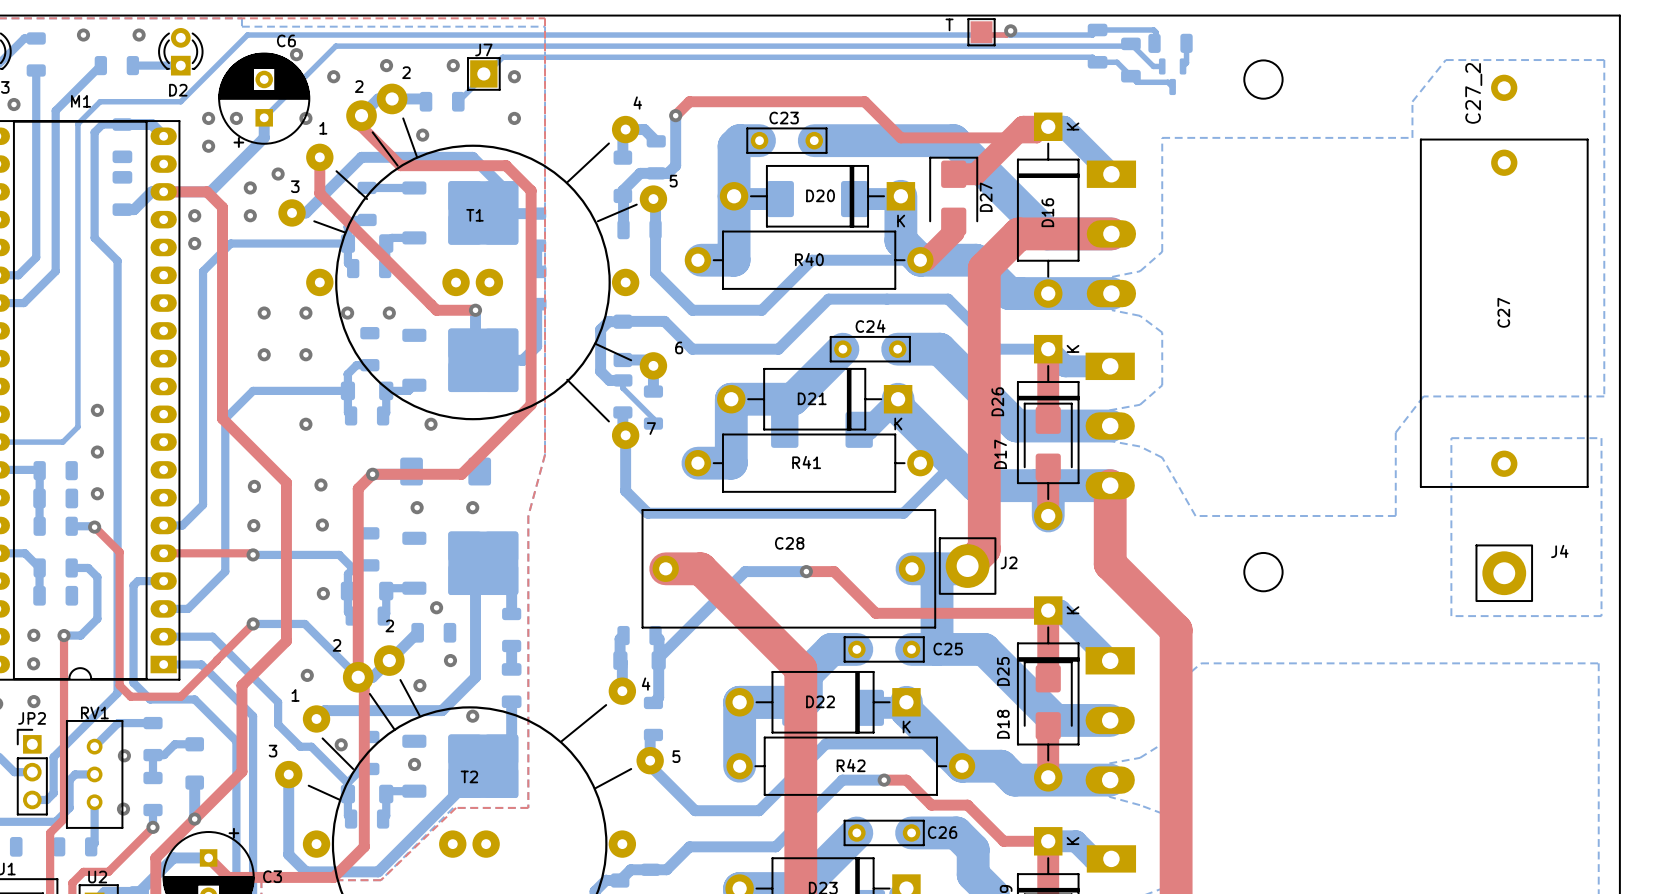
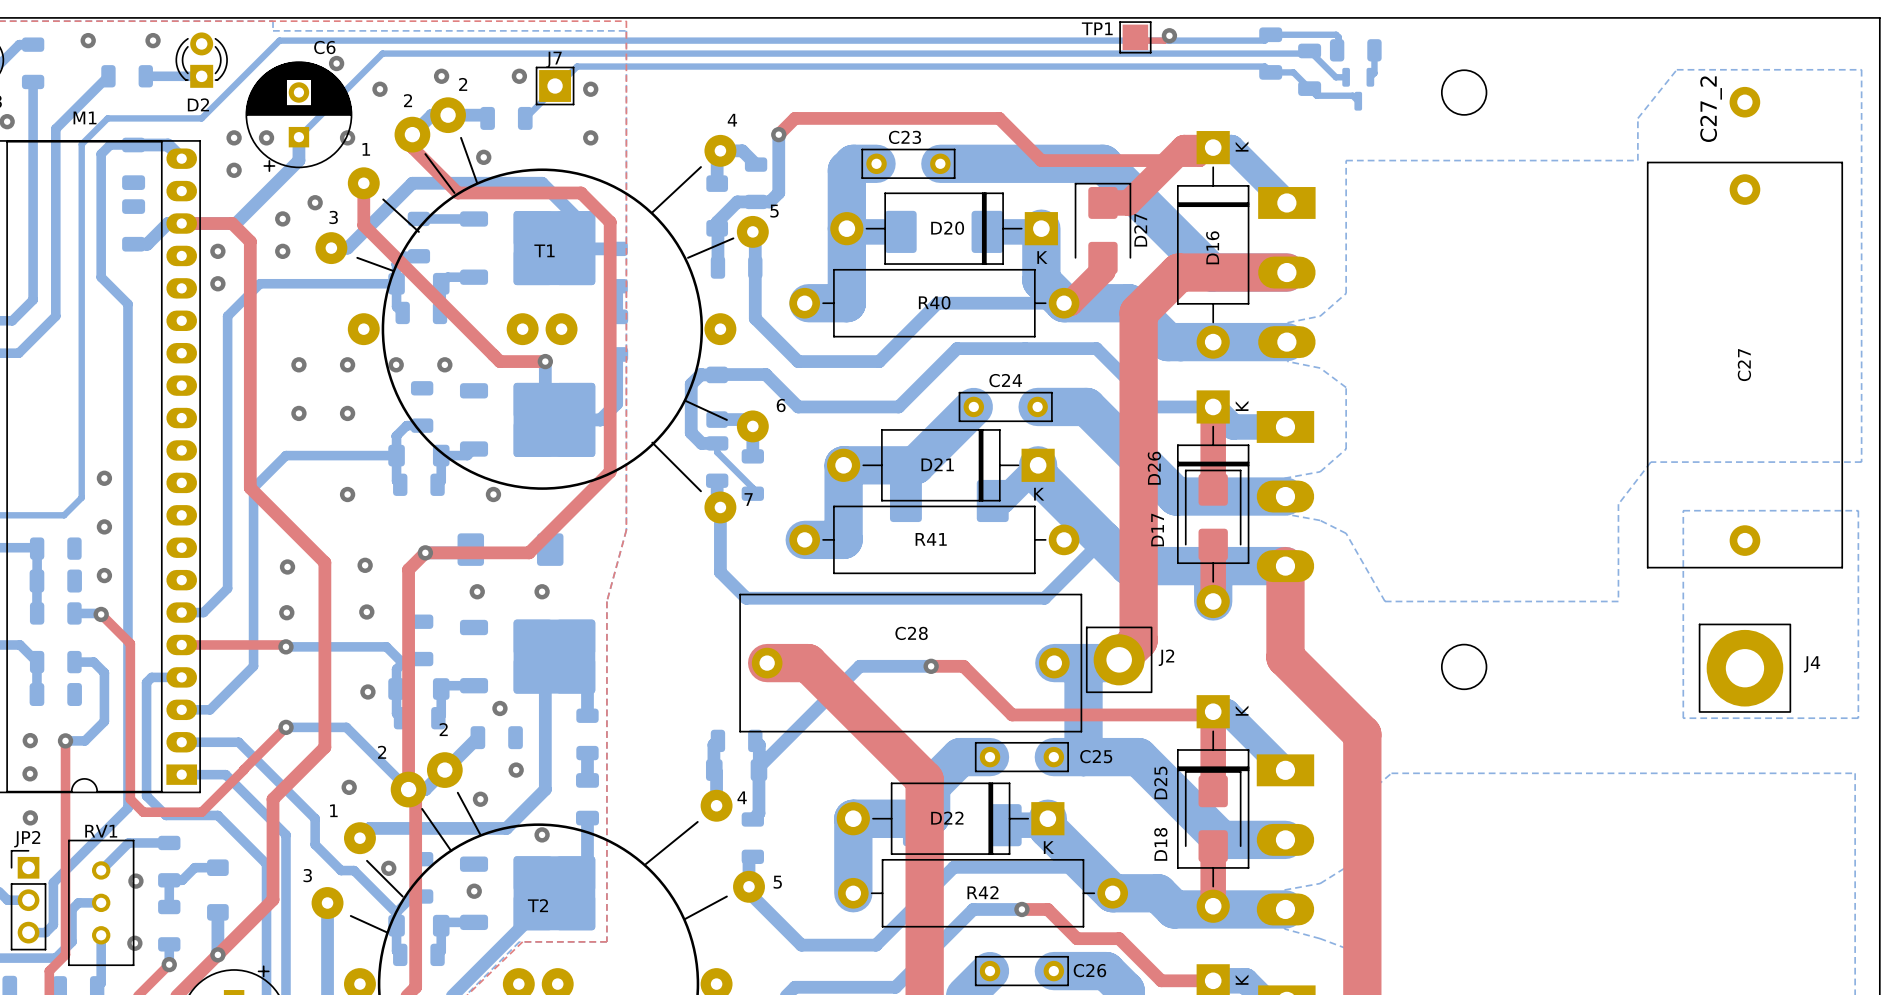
T name: T (949, 24) -> TP1 (1097, 28)
J4 footprint: [1475, 544, 1533, 602] -> [1698, 623, 1791, 713]

